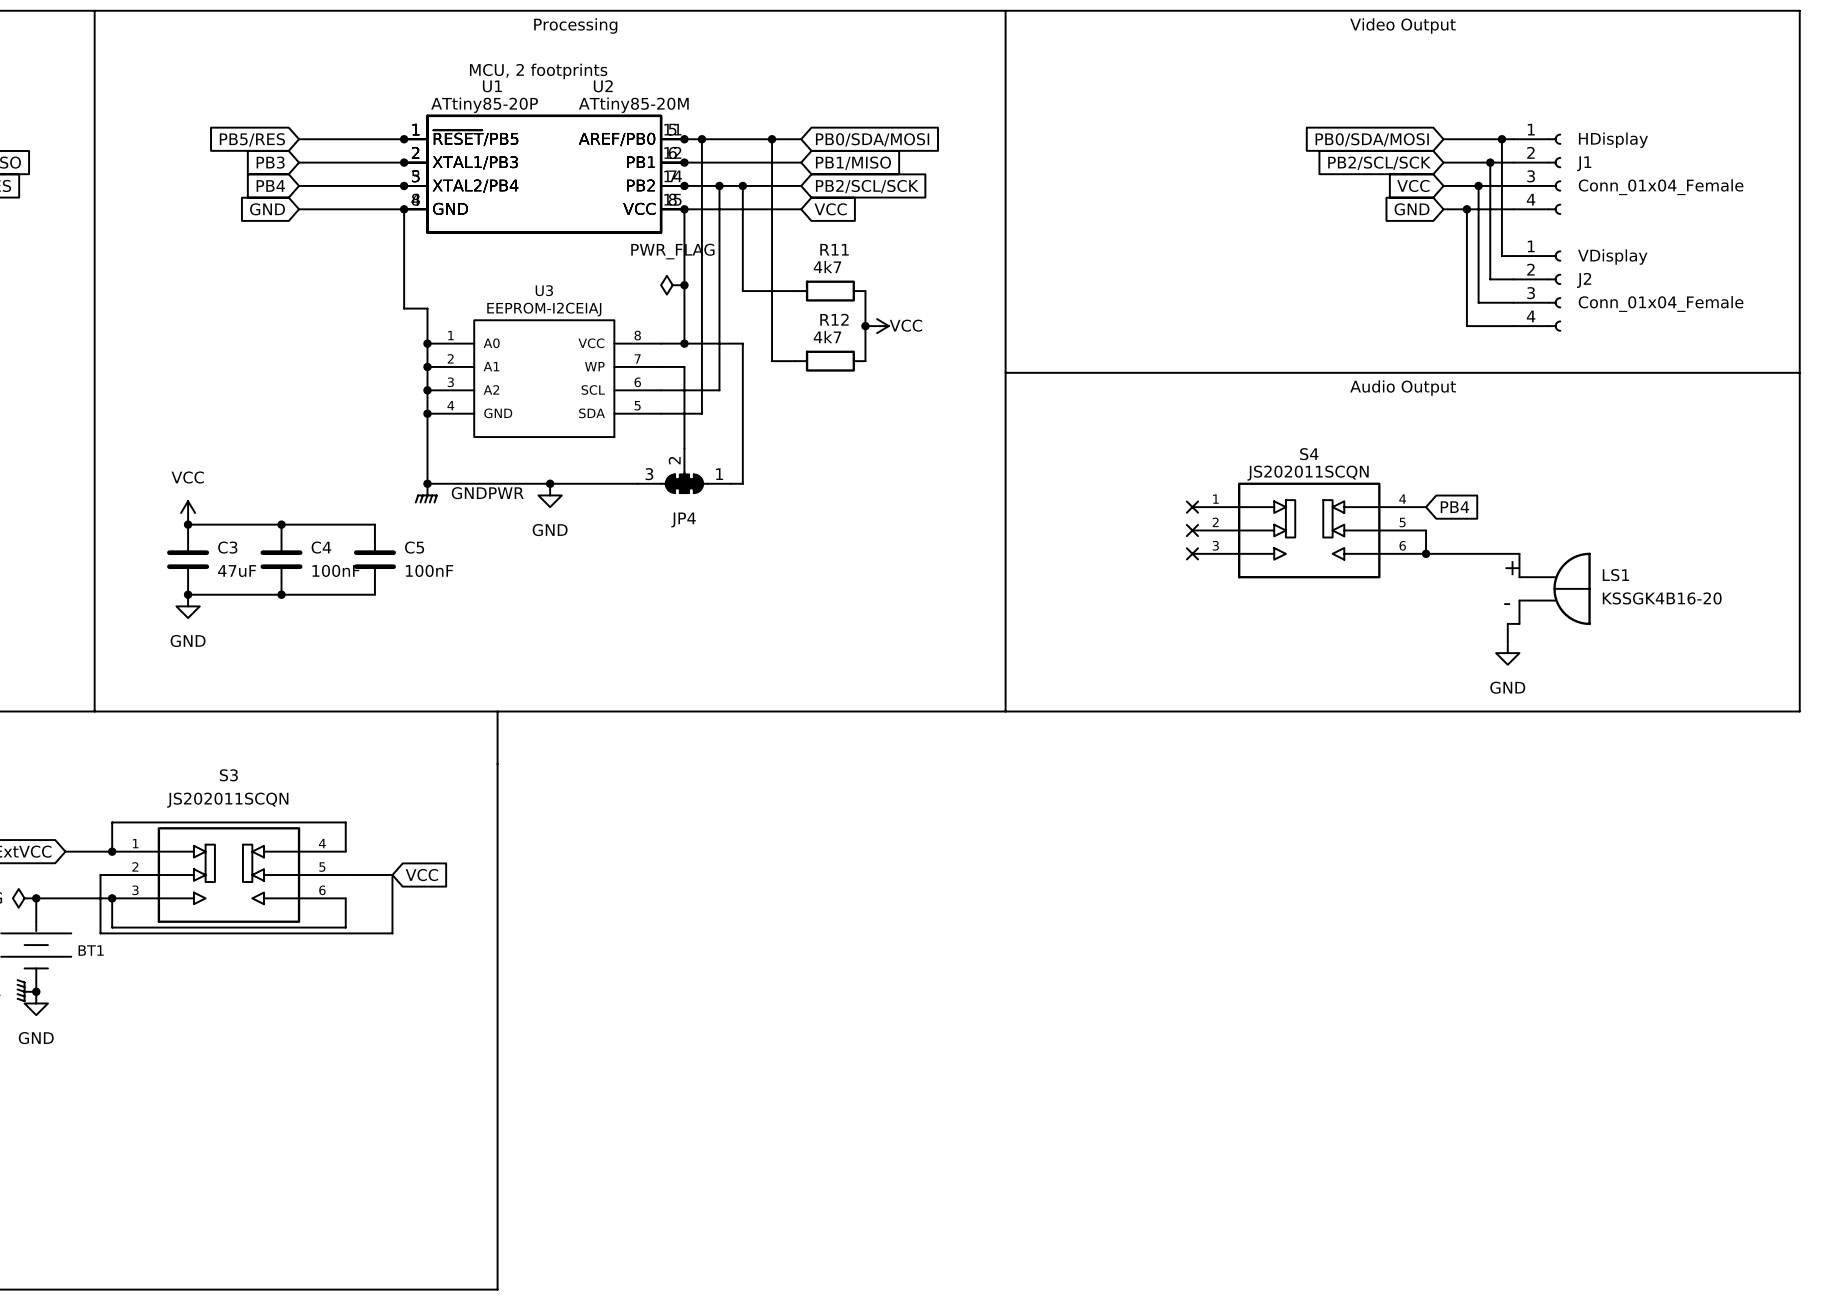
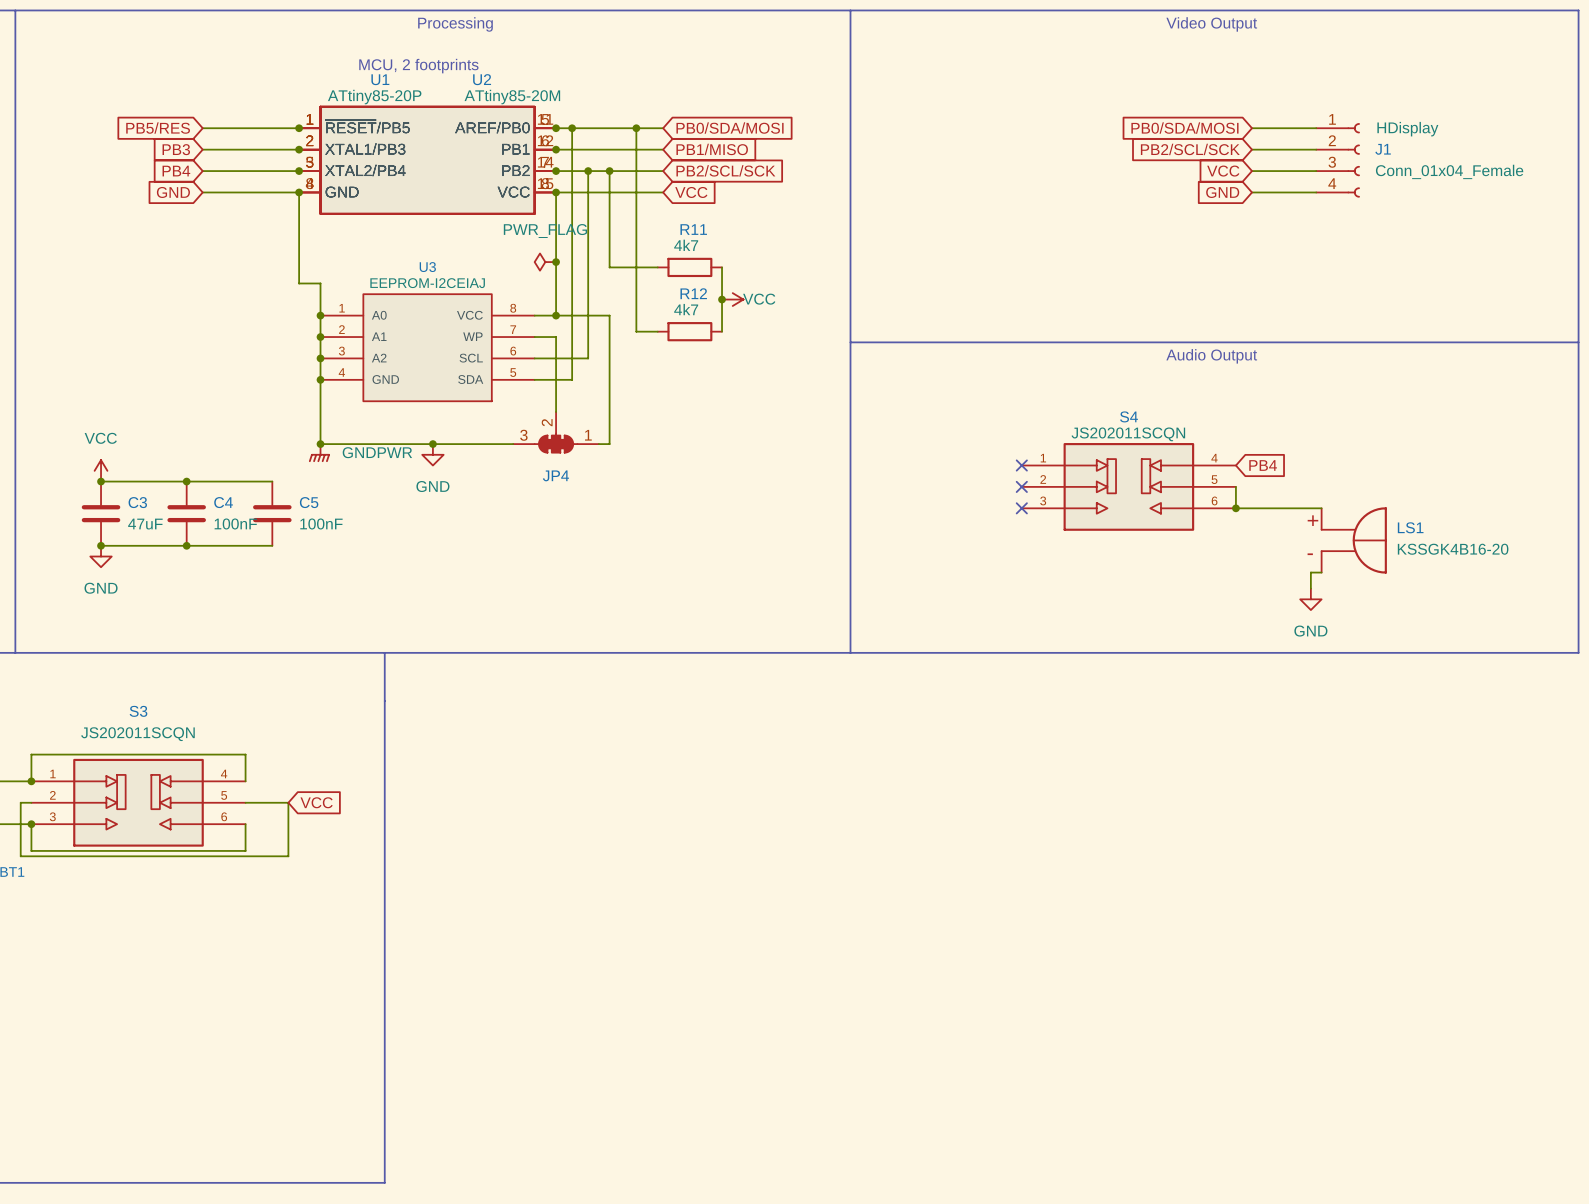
wire: (1501, 139) (1501, 256) (1513, 256) -> none
junction: (1501, 139) -> none
wire: (1490, 162) (1490, 279) (1513, 279) -> none
junction: (1490, 162) -> none
wire: (1478, 185) (1478, 302) (1513, 302) -> none
junction: (1478, 185) -> none
wire: (1466, 209) (1466, 326) (1513, 326) -> none
junction: (1466, 209) -> none
J2: Conn_01x04_Female (1537, 291) -> none

